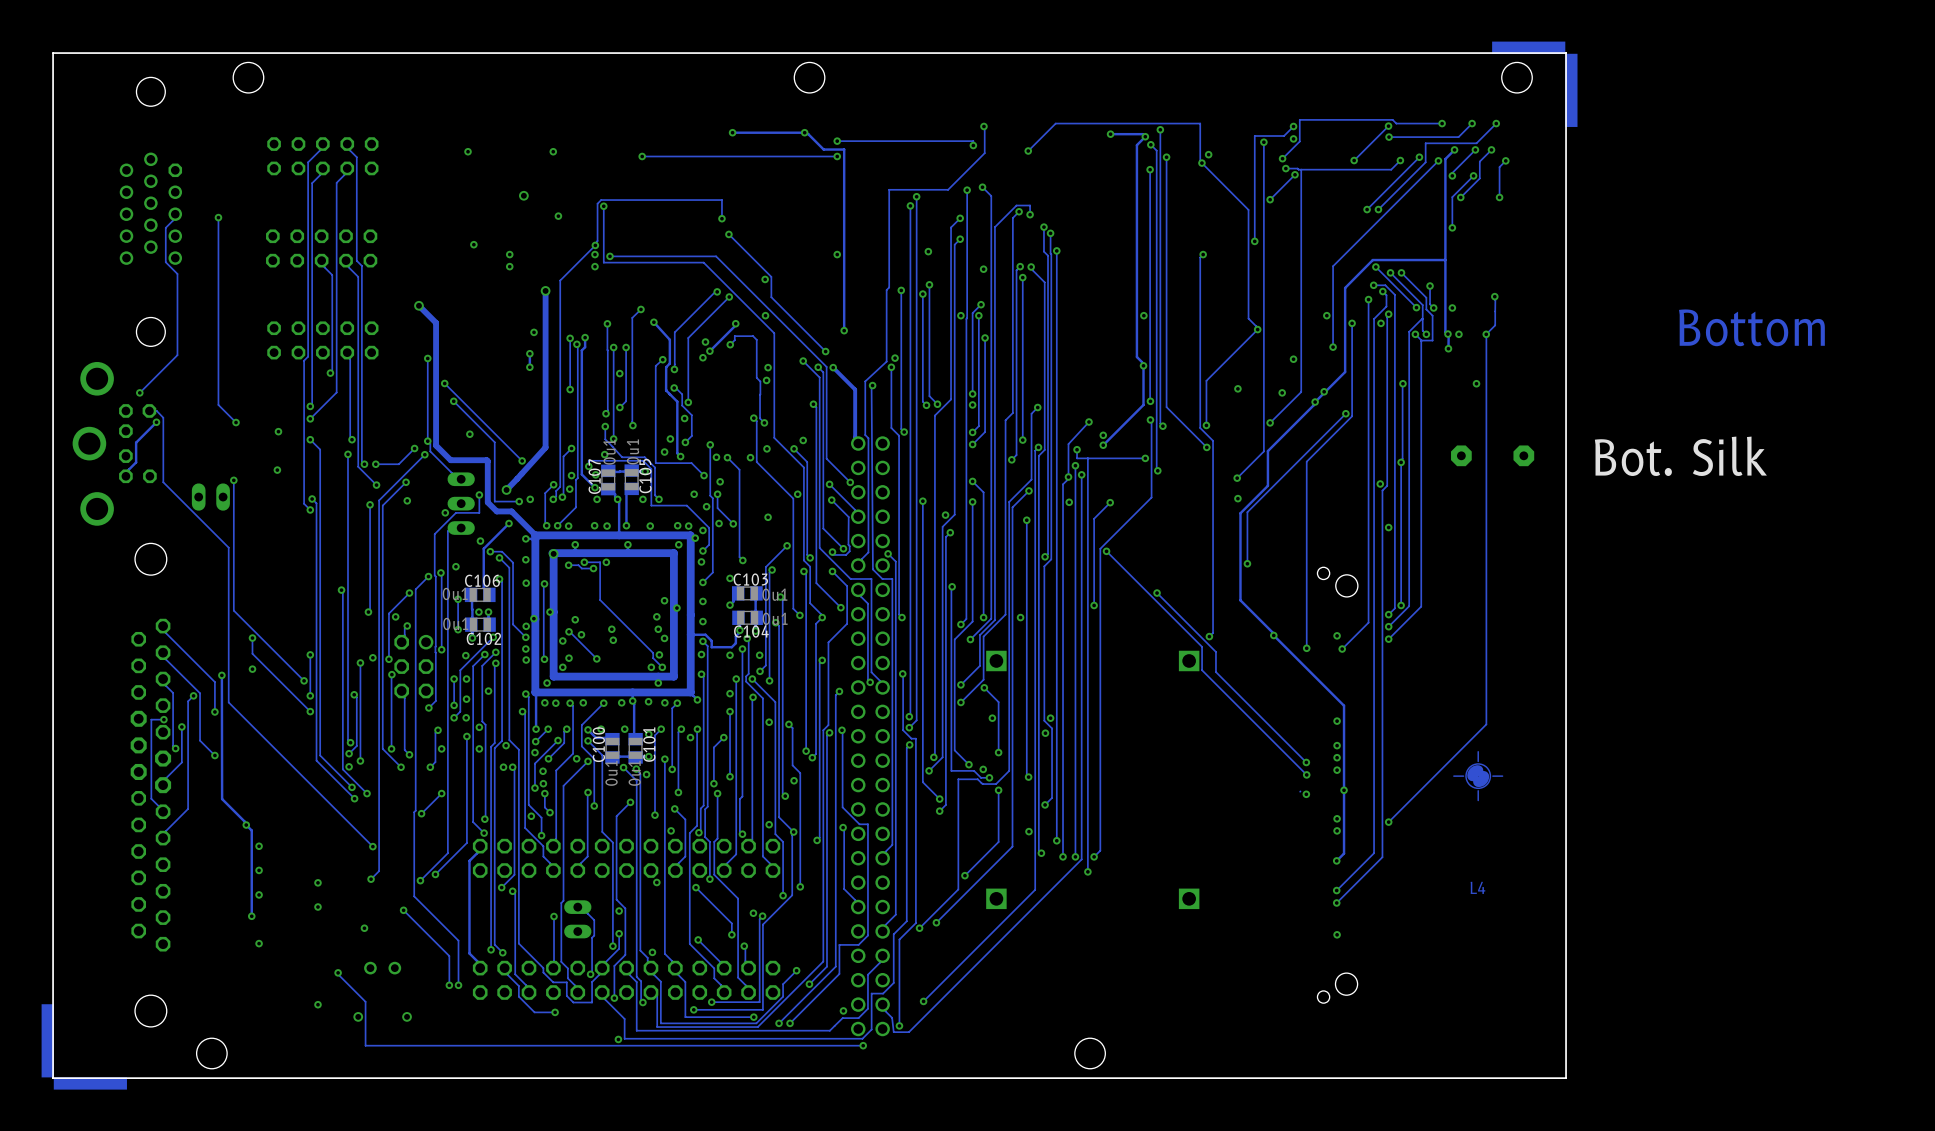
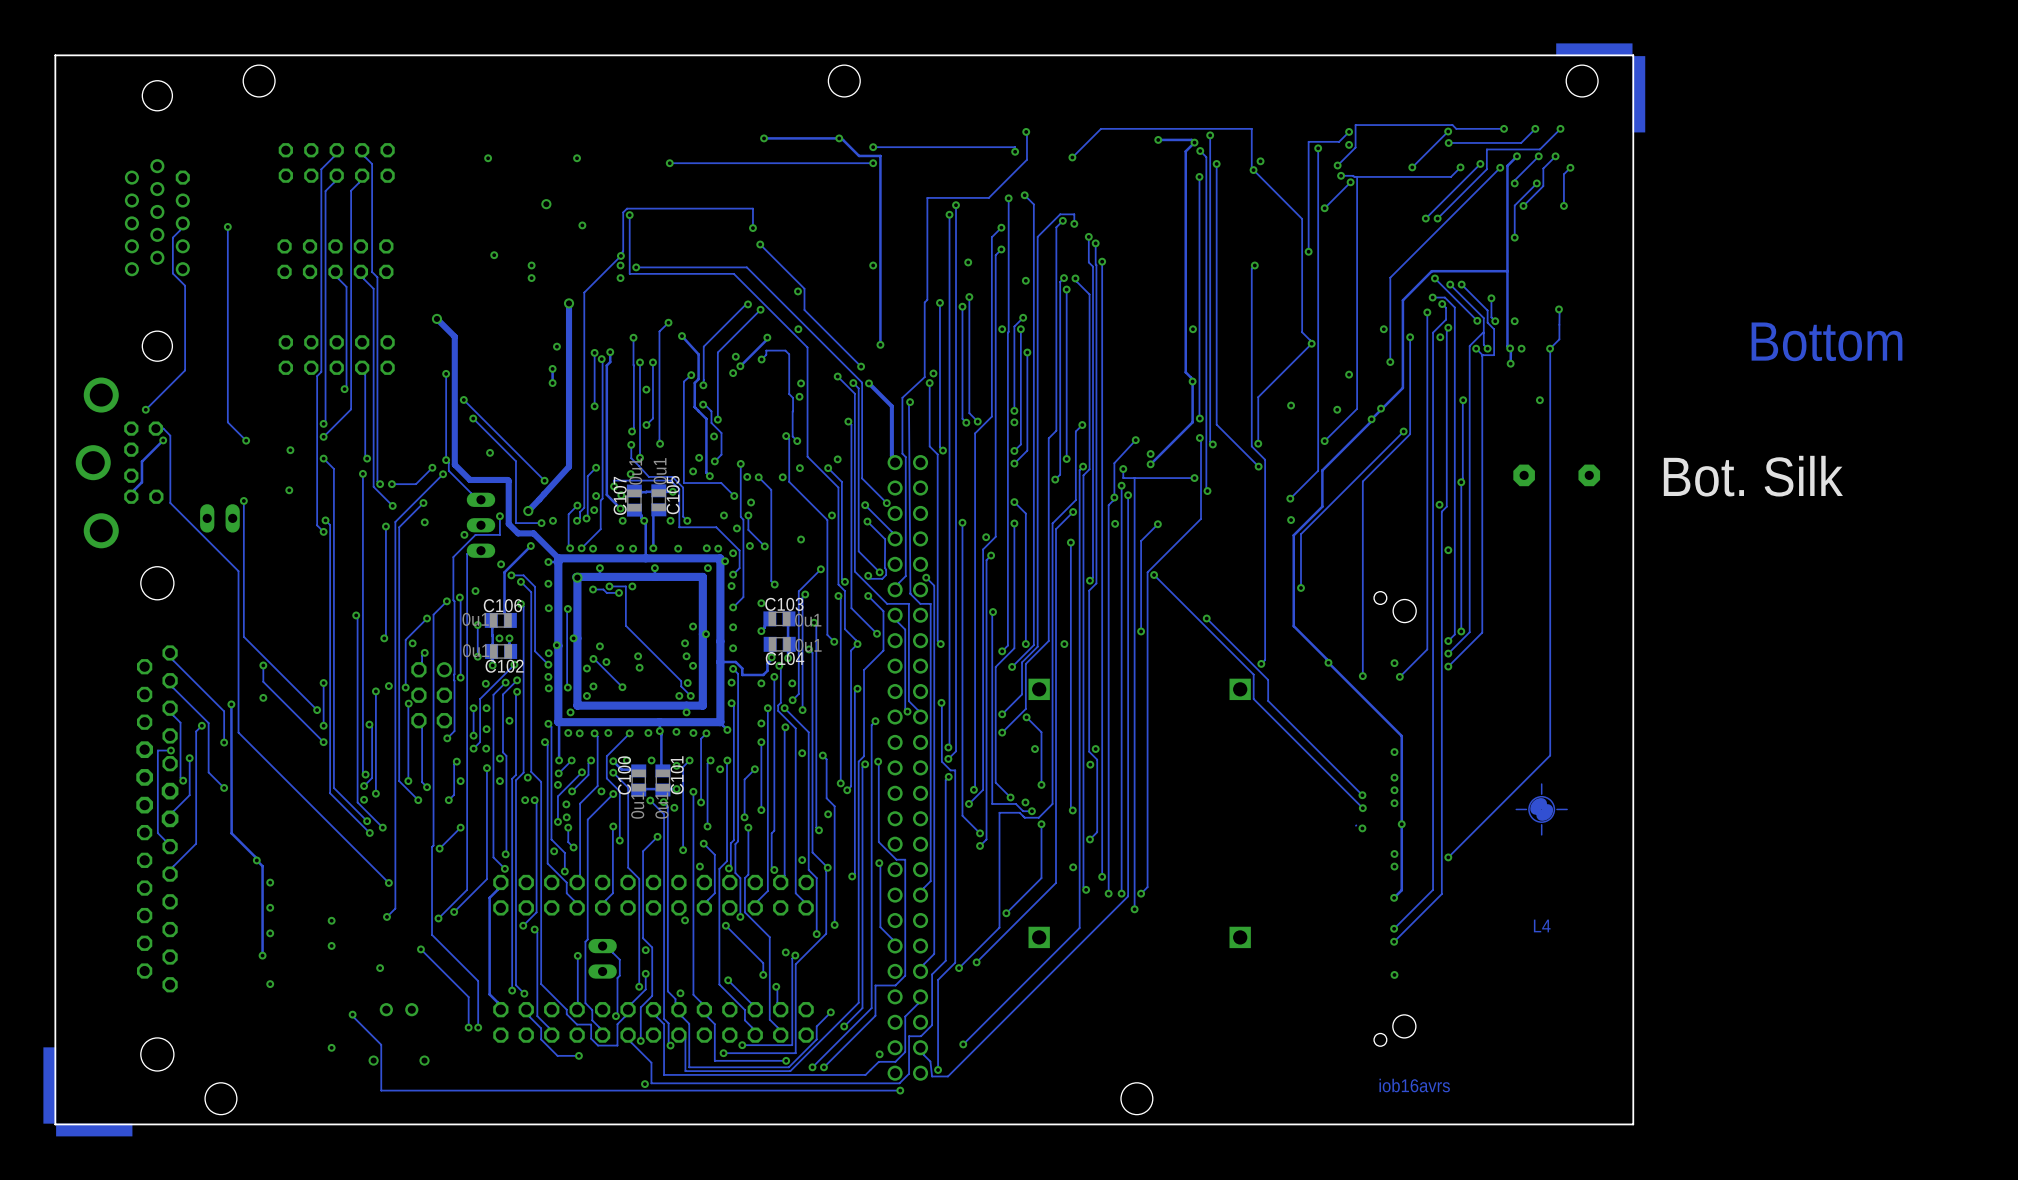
text: none -> iob16avrs (1414, 1085)

